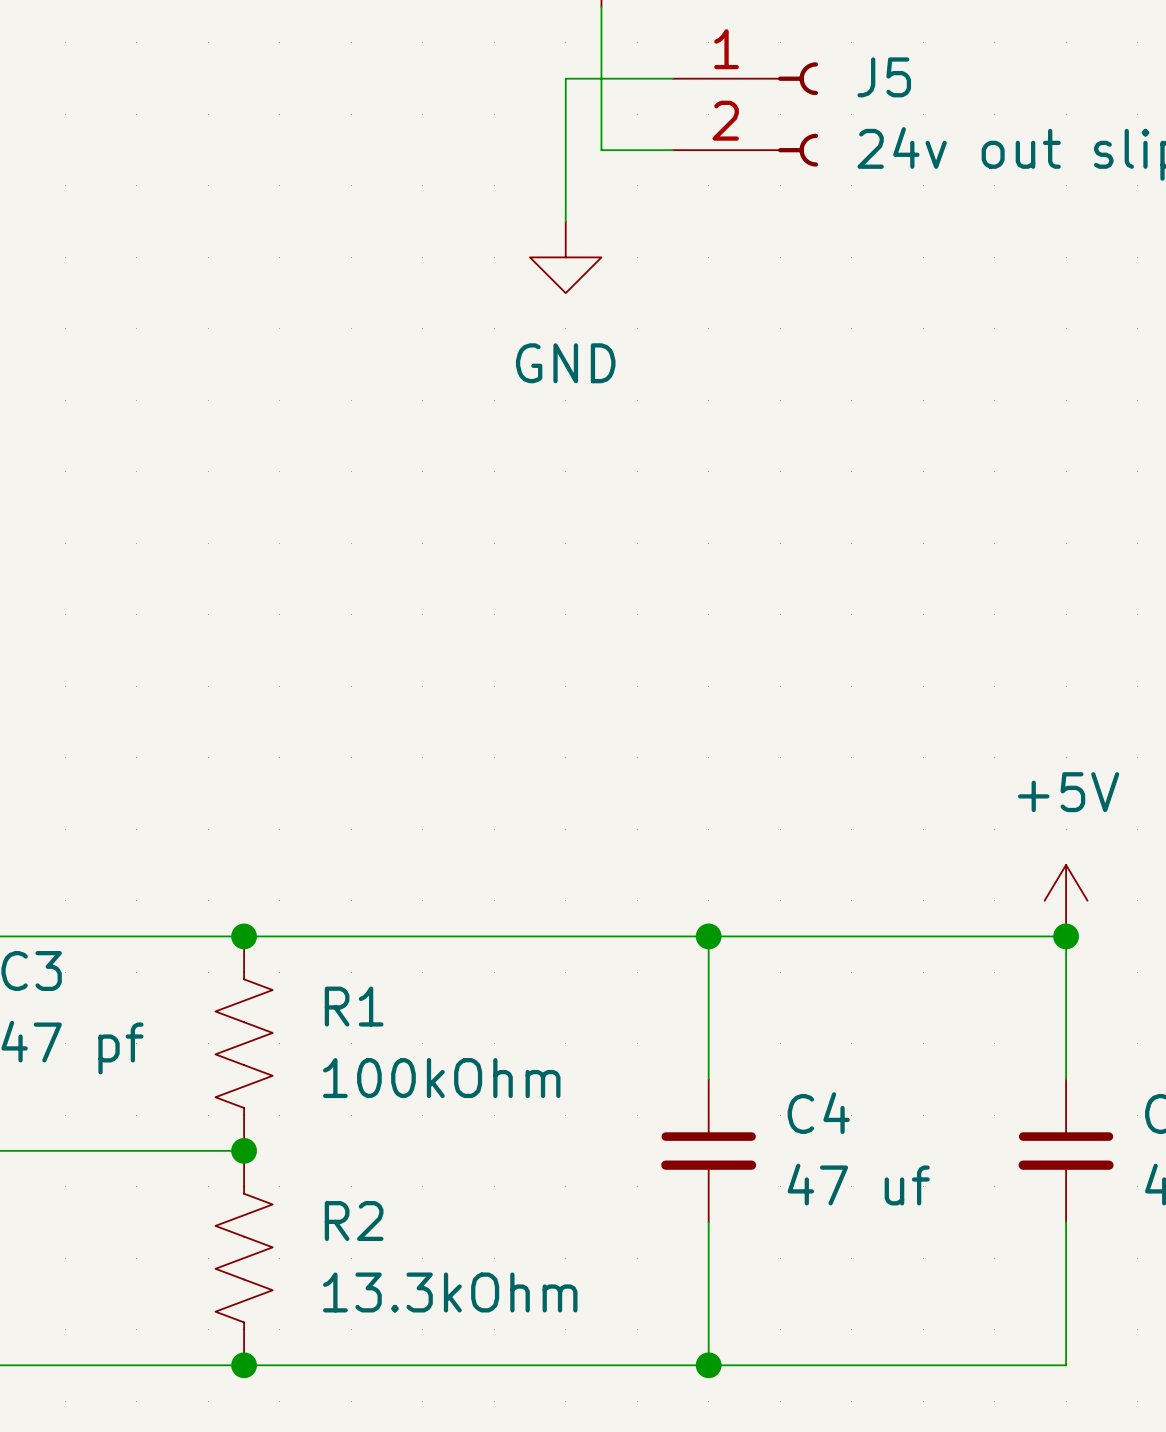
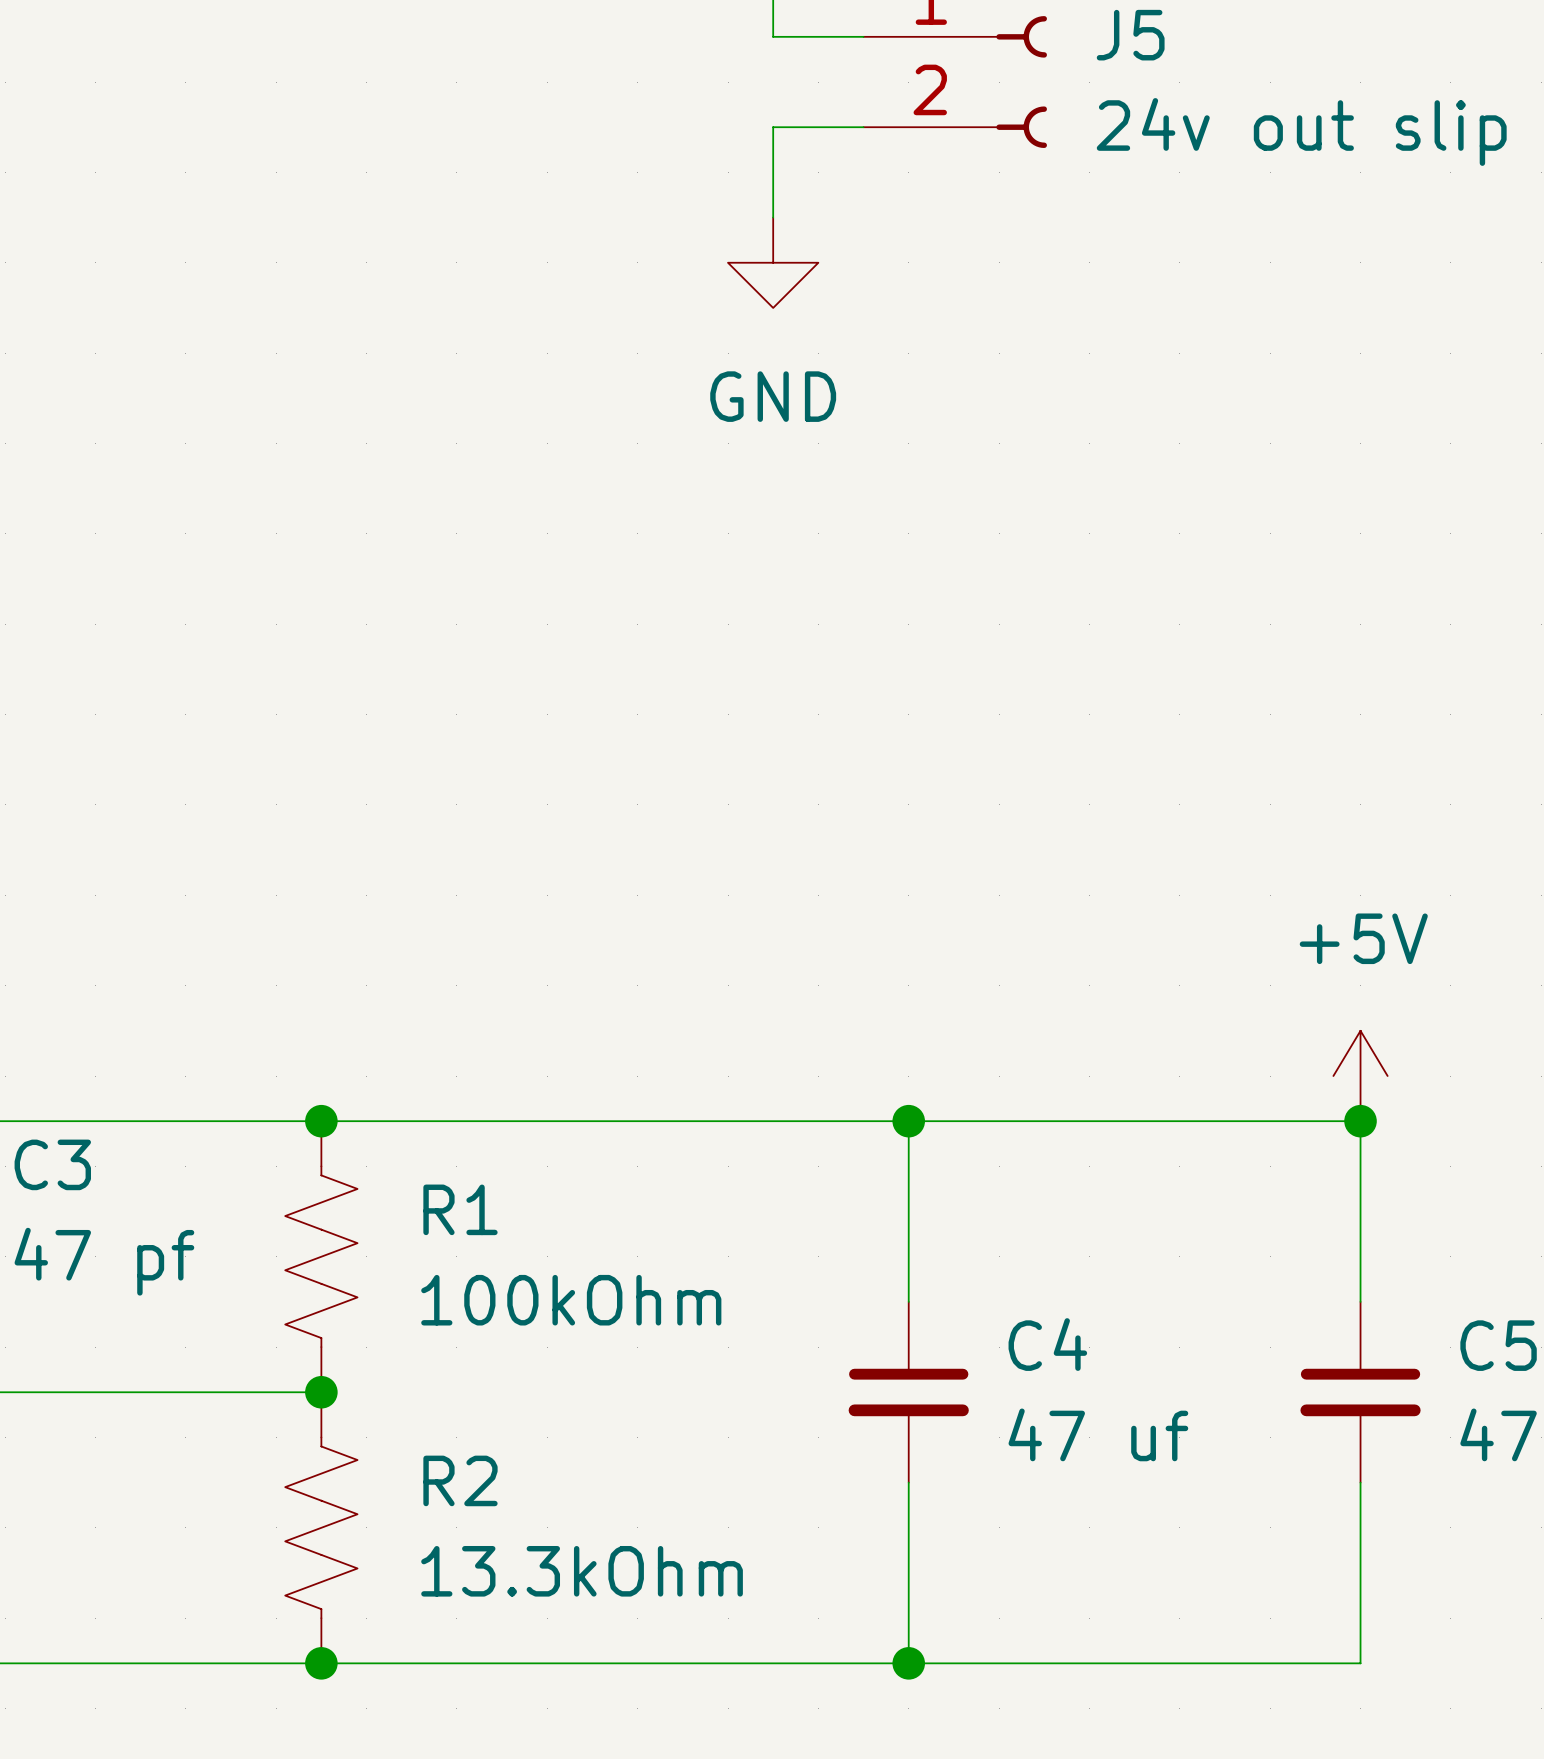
wire: (601, 150) (601, 78) (565, 78) (565, 221) -> (773, 127) (773, 217)
power symbol position: GND (565, 257) -> GND (773, 262)

